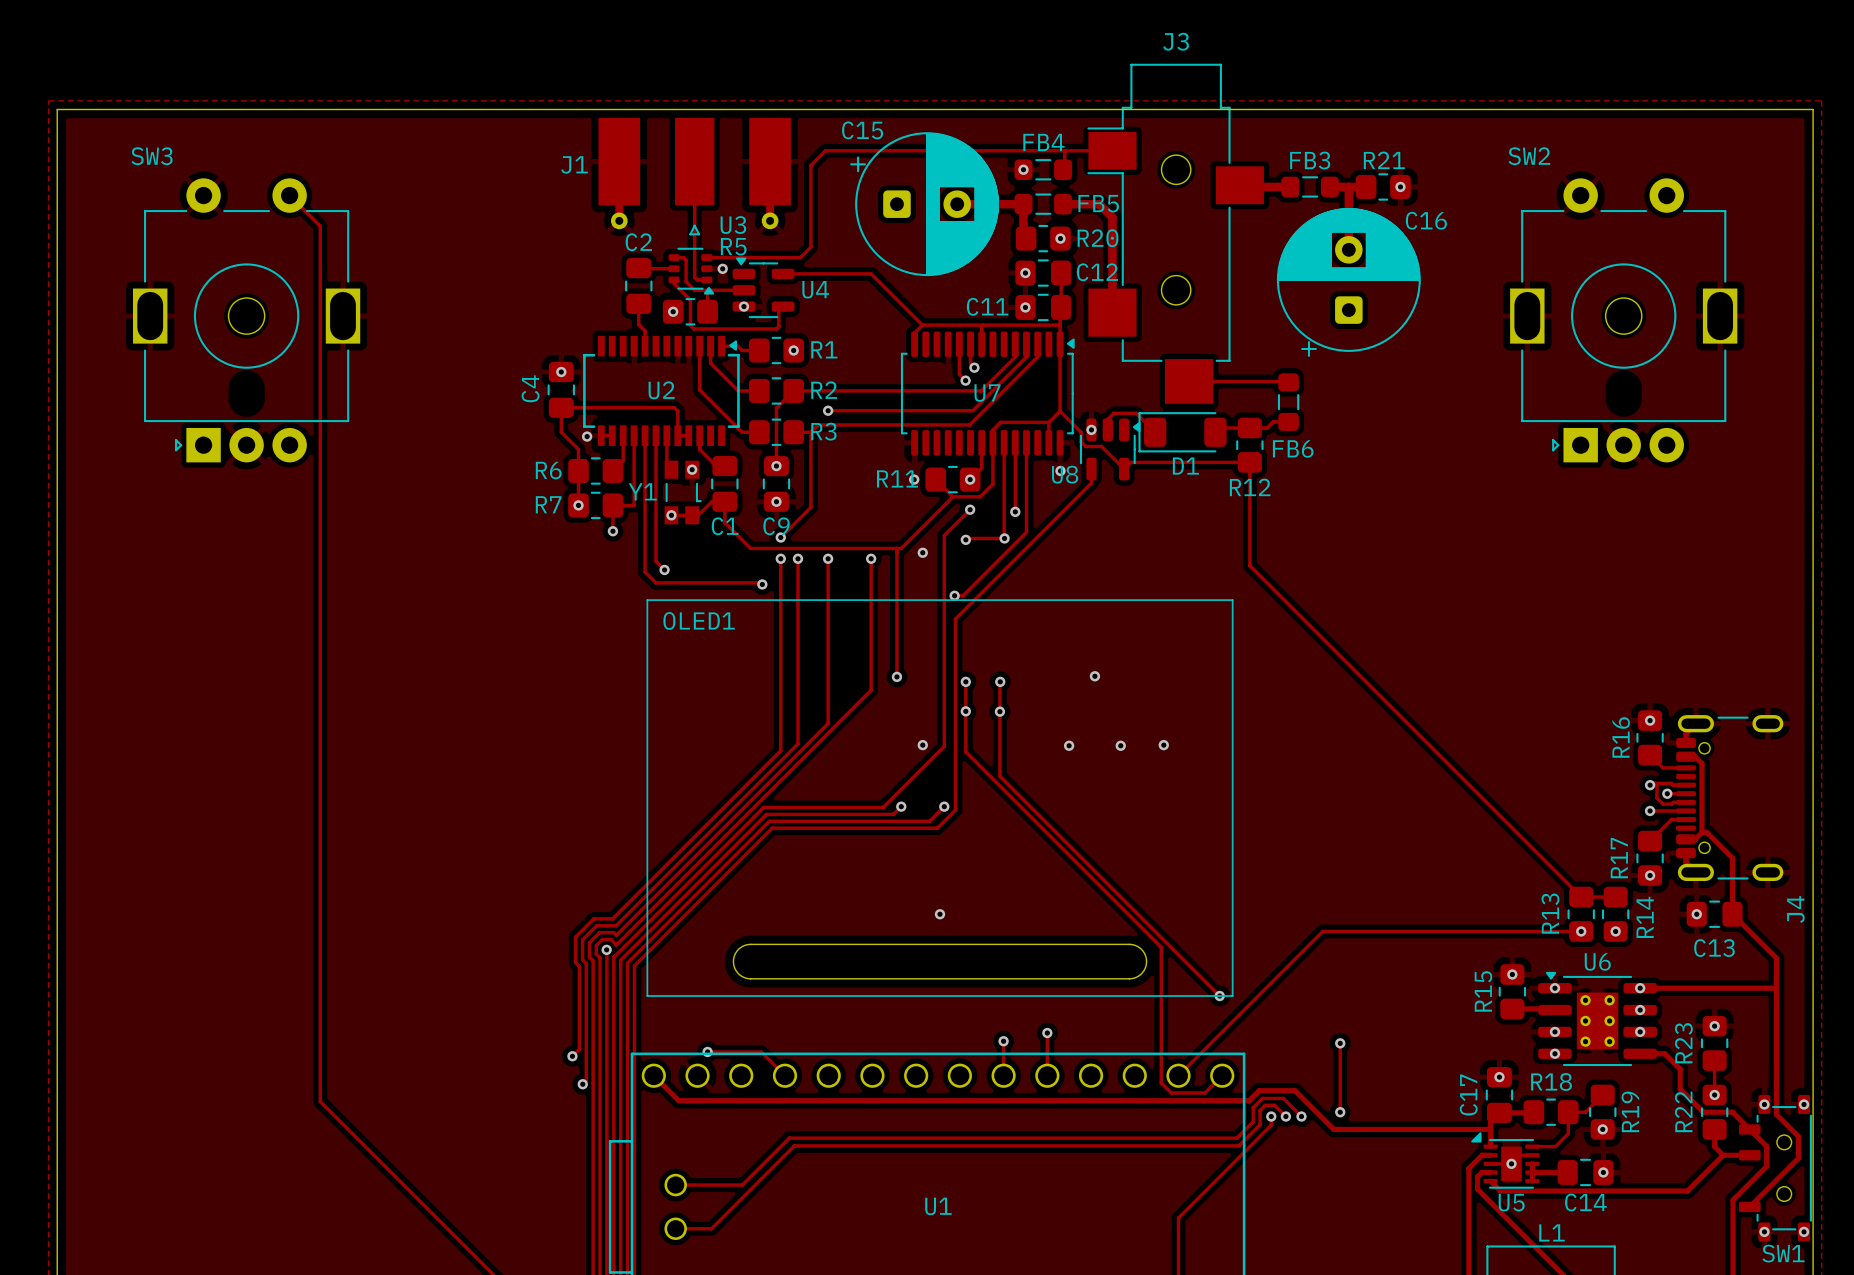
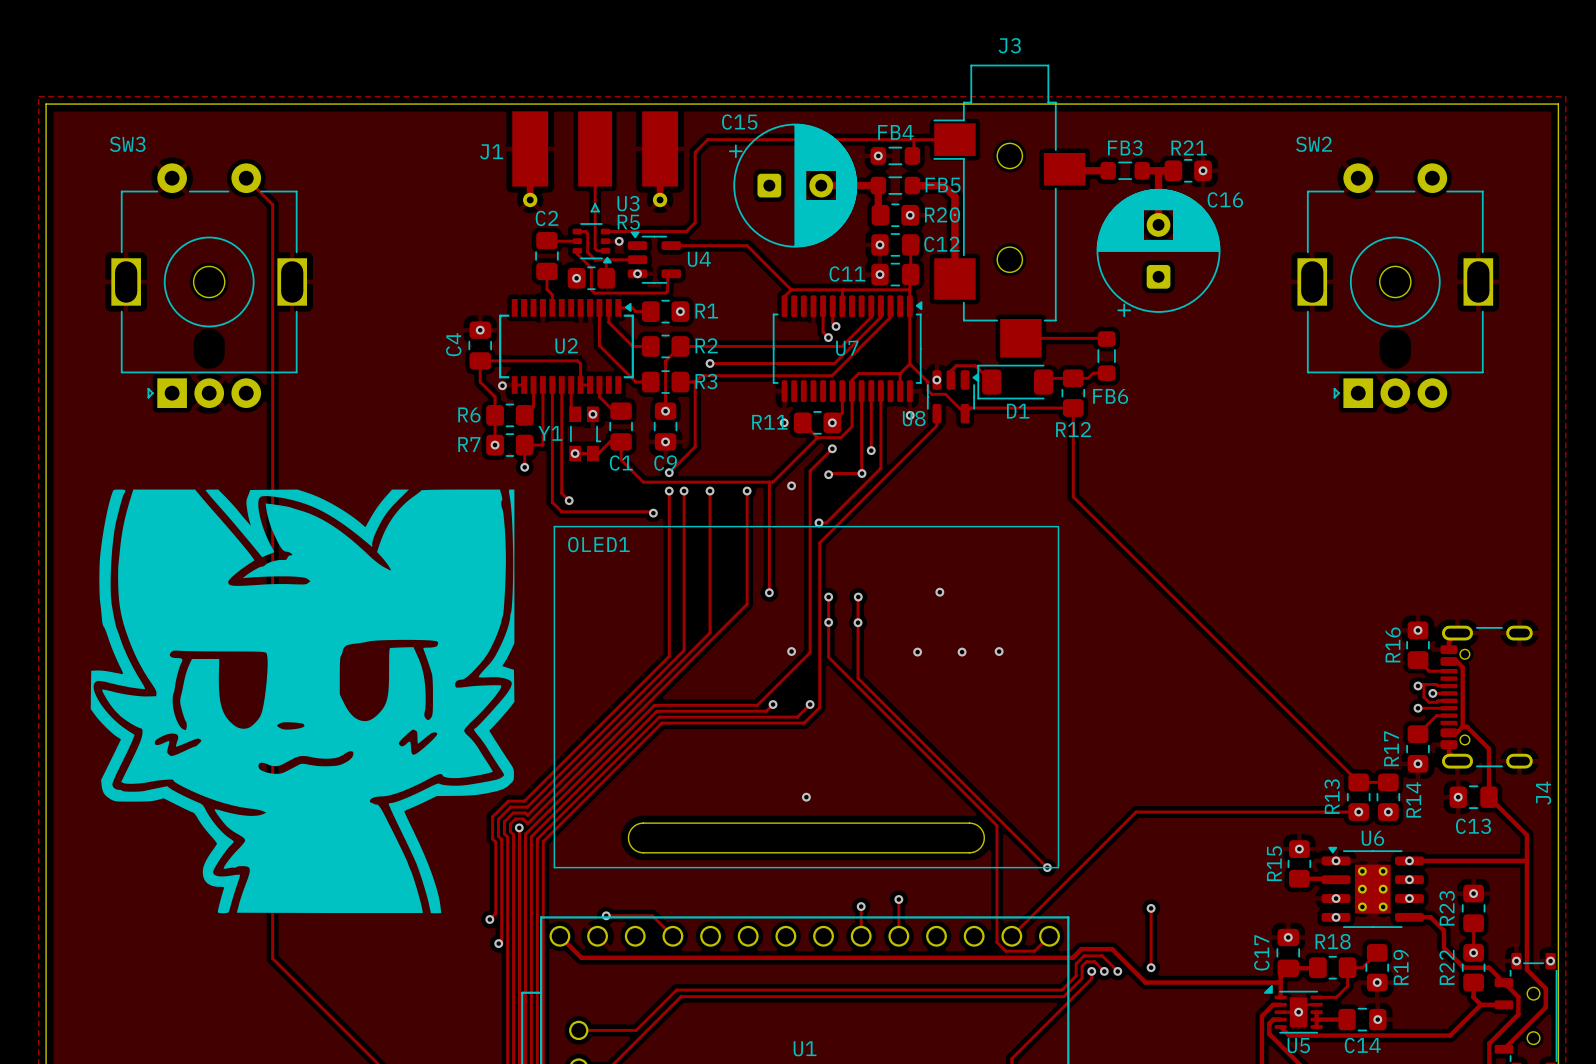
drawing: none -> [90, 489, 515, 914]

